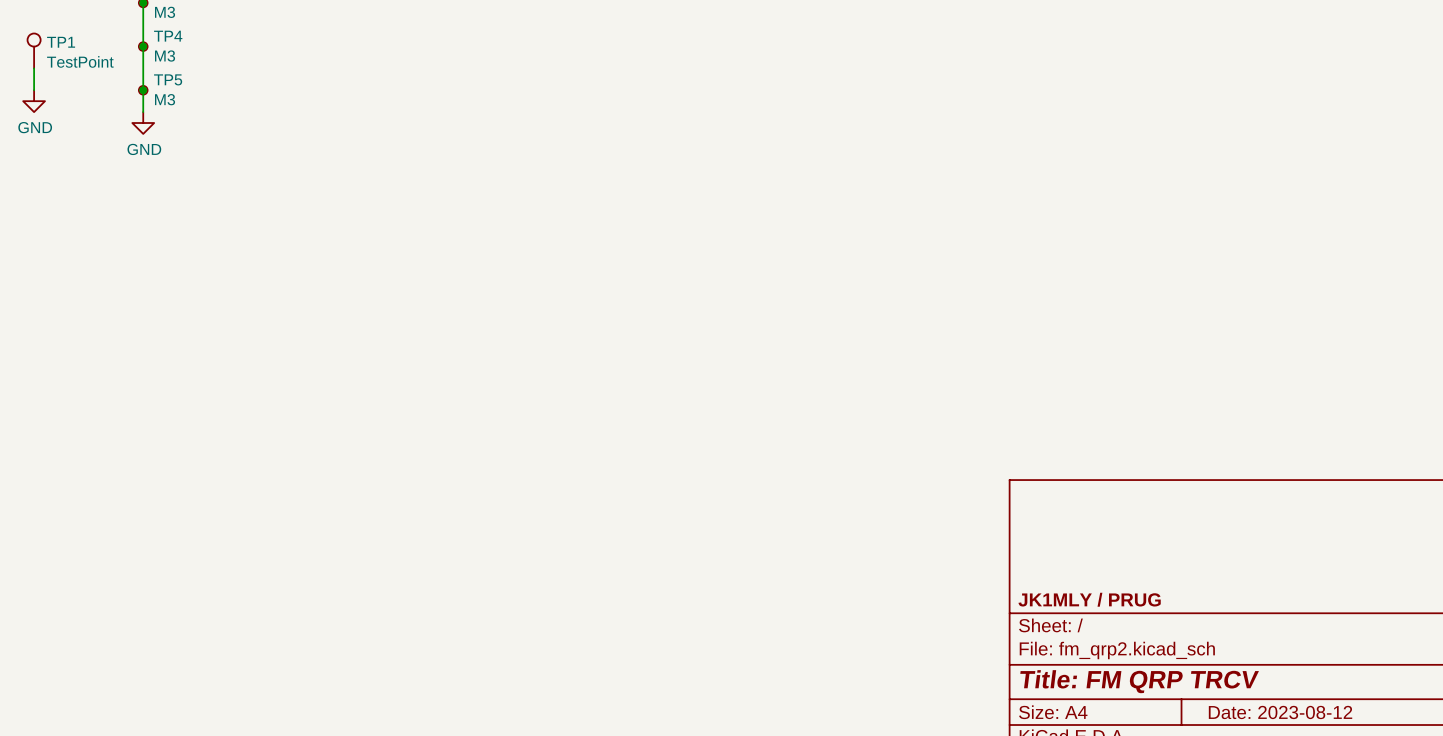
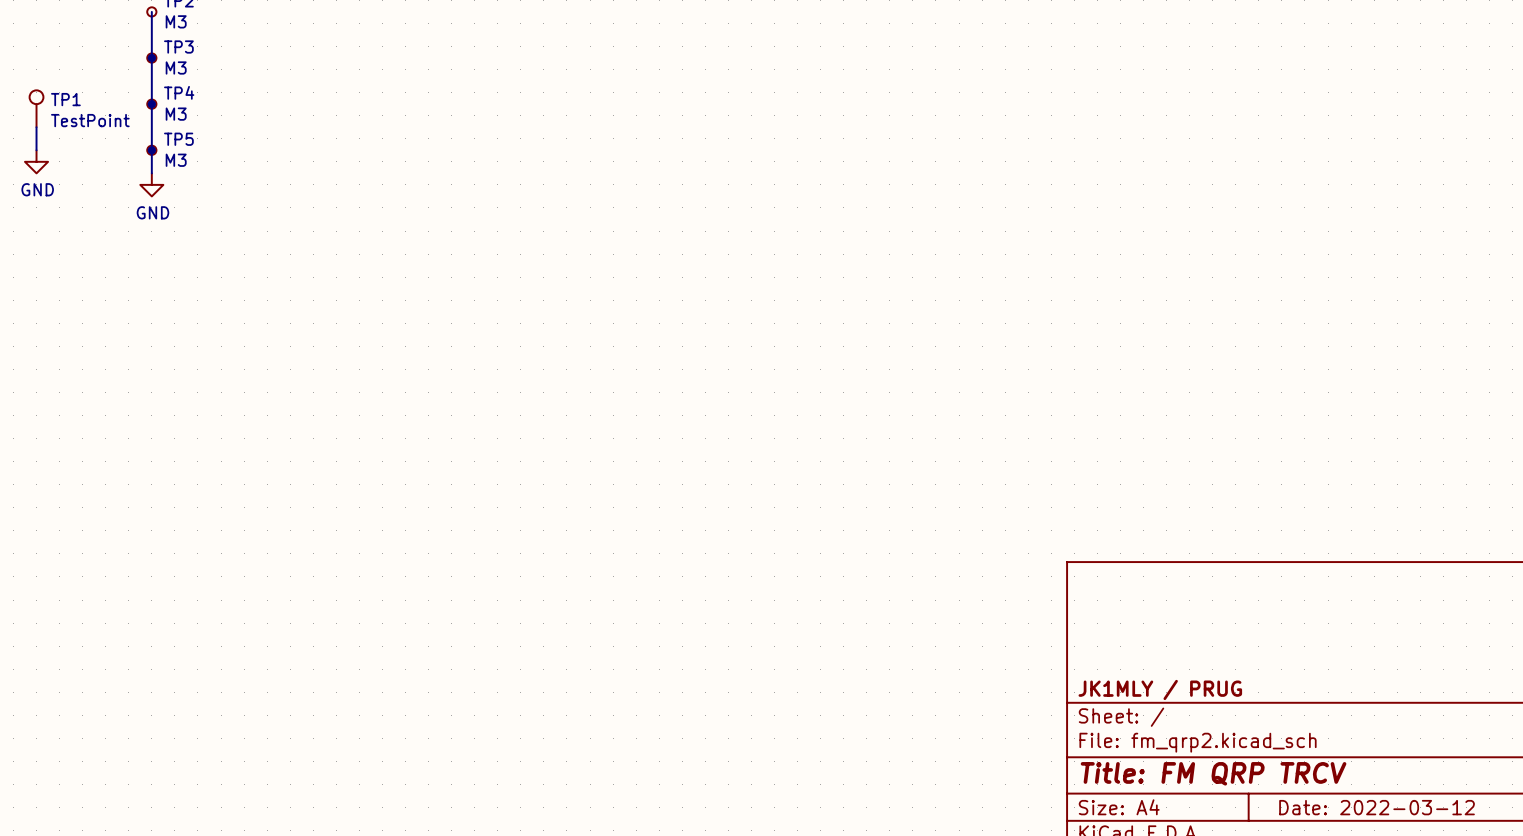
title block: Date: 2023-08-12 (1280, 712) -> Date: 2022-03-12 (1377, 807)

